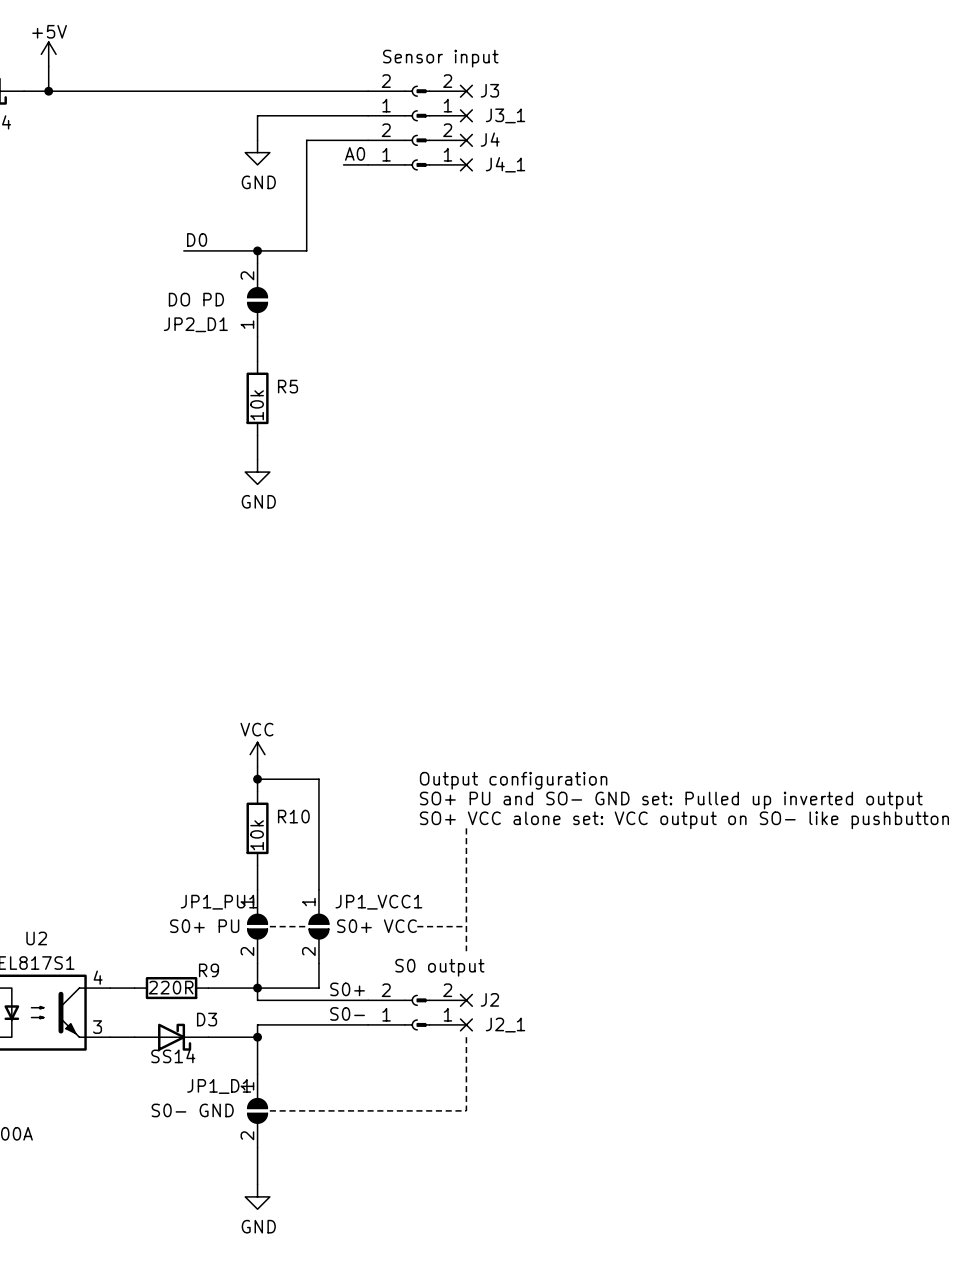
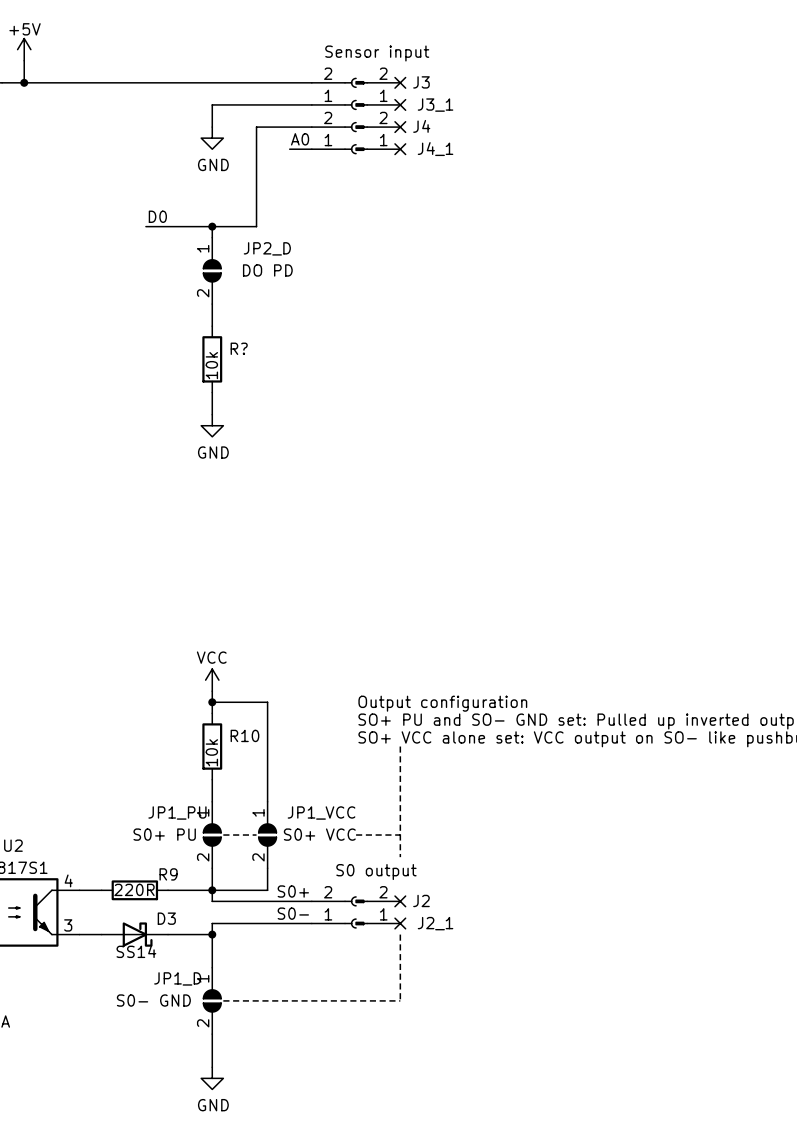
JP2_D1 rotation: 0° (257, 300) -> 180° (212, 270)
JP2_D1 name: JP2_D1 (195, 324) -> JP2_D (267, 248)
R5 name: R5 (288, 386) -> R? (239, 348)
JP1_PU1 name: JP1_PU1 (219, 902) -> JP1_PU (177, 813)
JP1_VCC1 name: JP1_VCC1 (378, 902) -> JP1_VCC (321, 813)
JP1_D1 name: JP1_D1 (219, 1086) -> JP1_D (177, 978)

